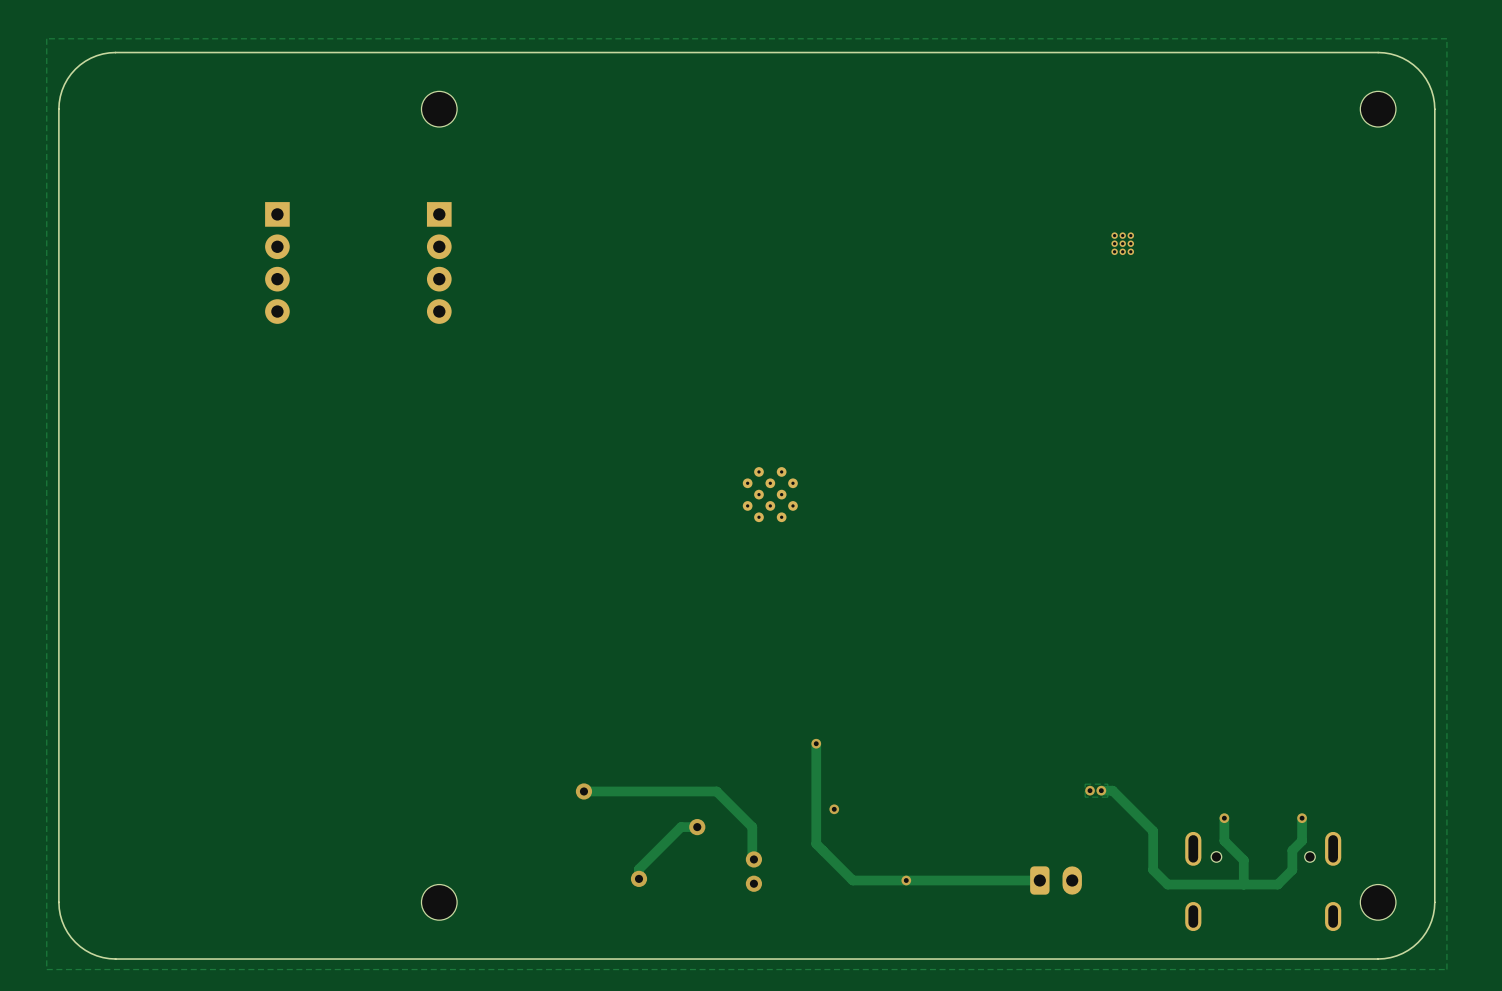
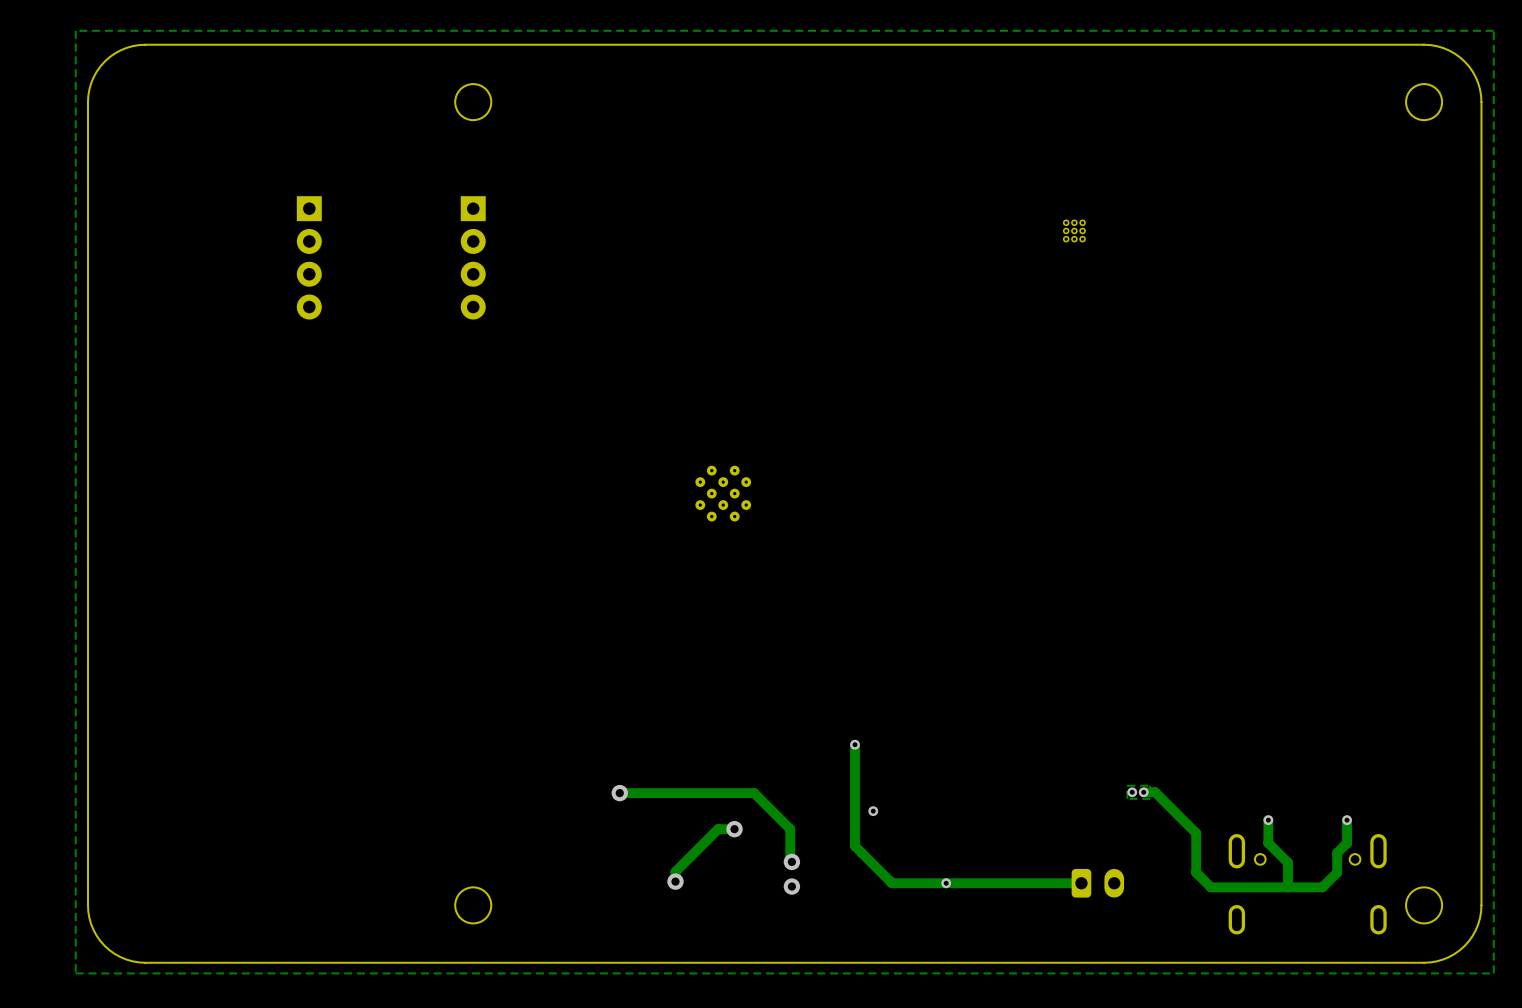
part position: (1122, 243) -> (1074, 230)
part position: (770, 494) -> (723, 493)

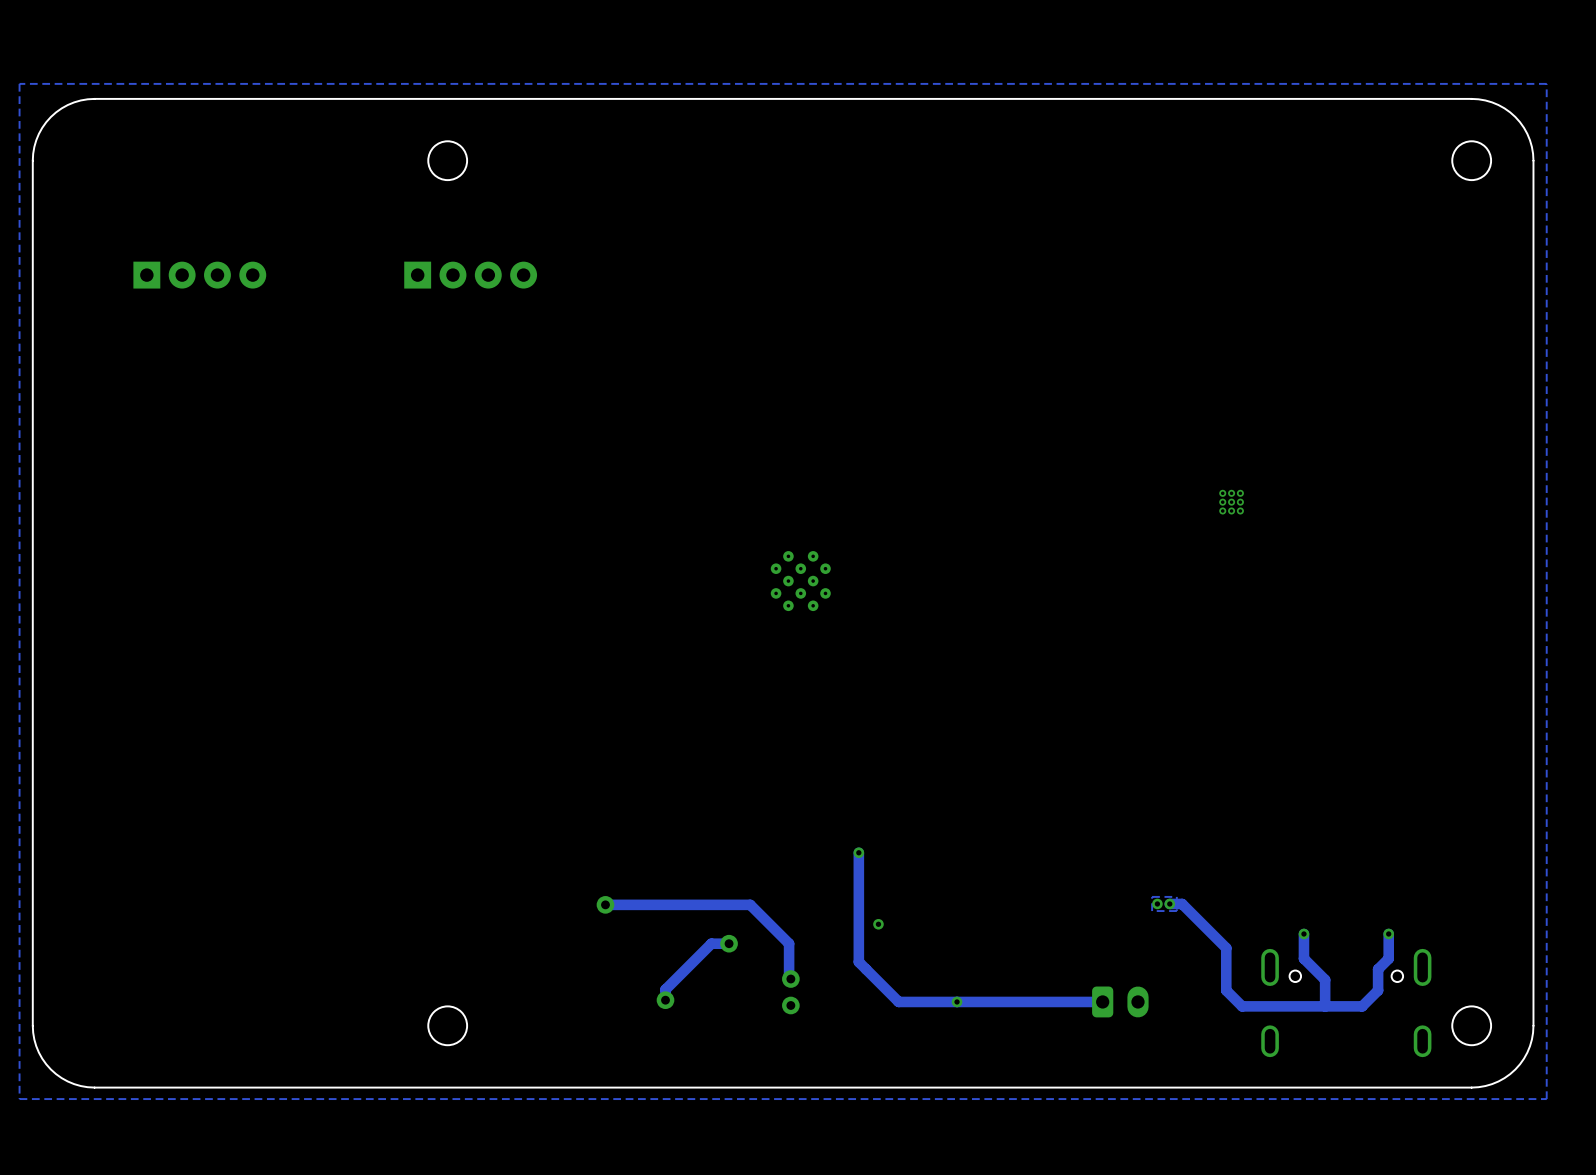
part position: (1074, 230) -> (1231, 502)
part rotation: 0° (309, 257) -> 90° counterclockwise (199, 275)
part position: (309, 257) -> (199, 275)
part rotation: 0° (473, 257) -> 90° counterclockwise (470, 275)
part position: (723, 493) -> (800, 581)

